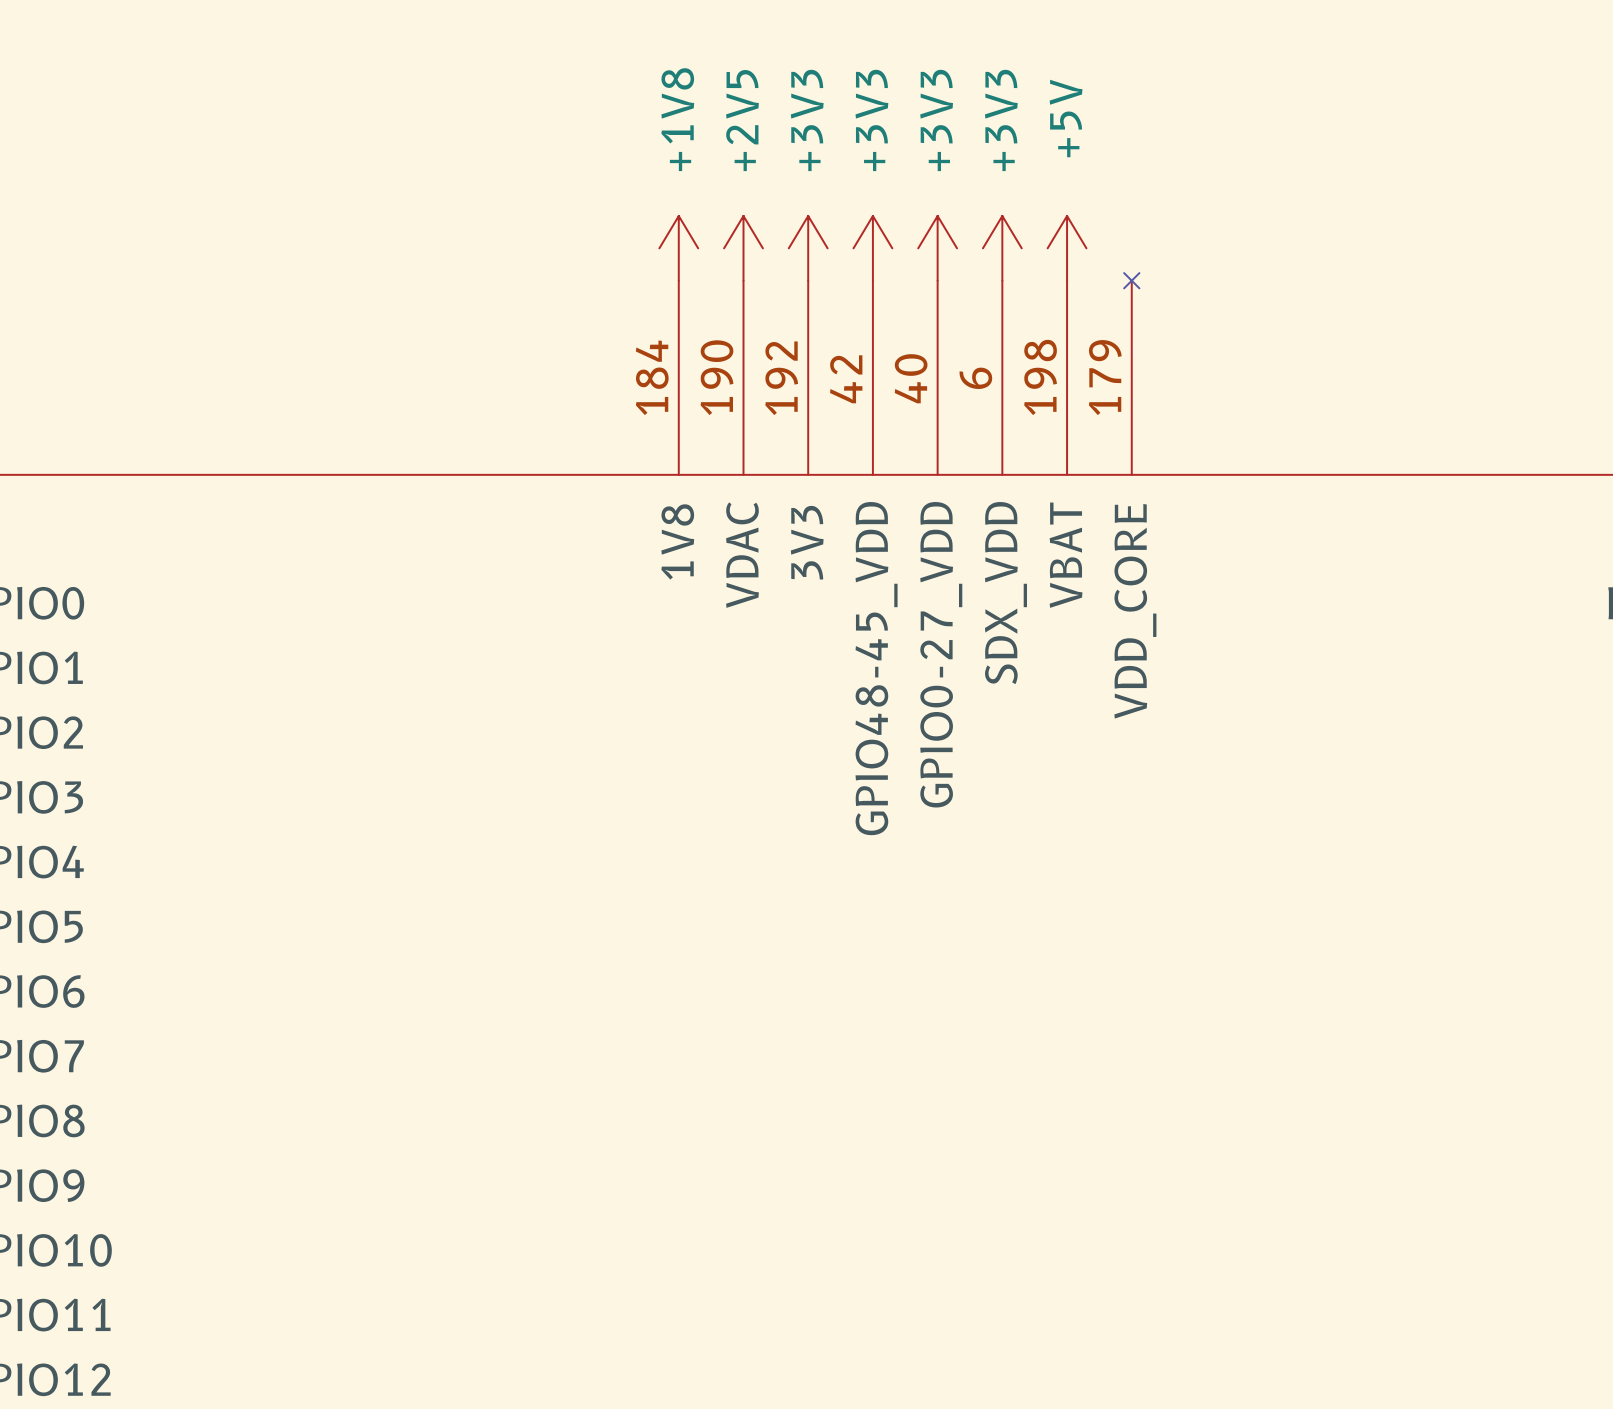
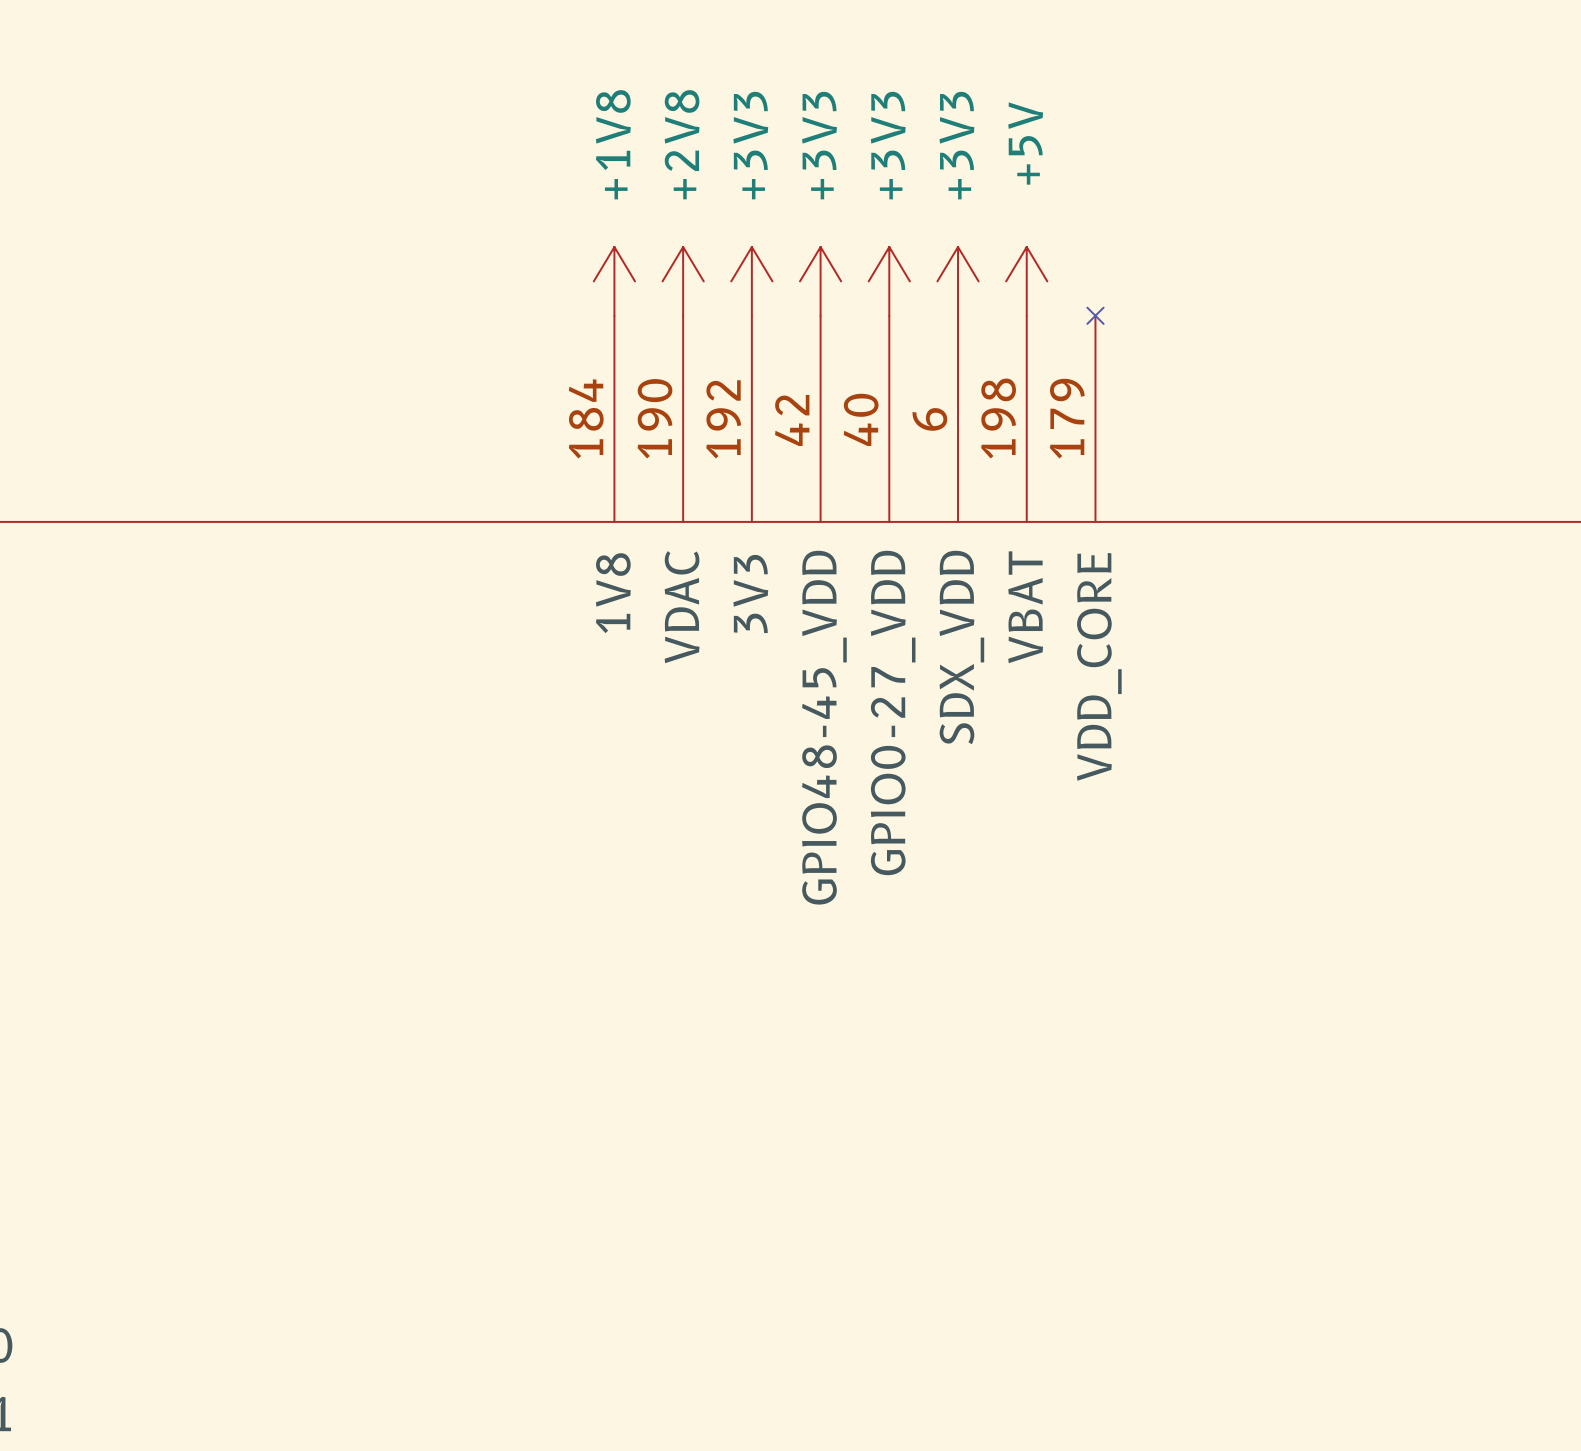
power symbol: +2V5 (743, 248) -> +2V8 (683, 281)

